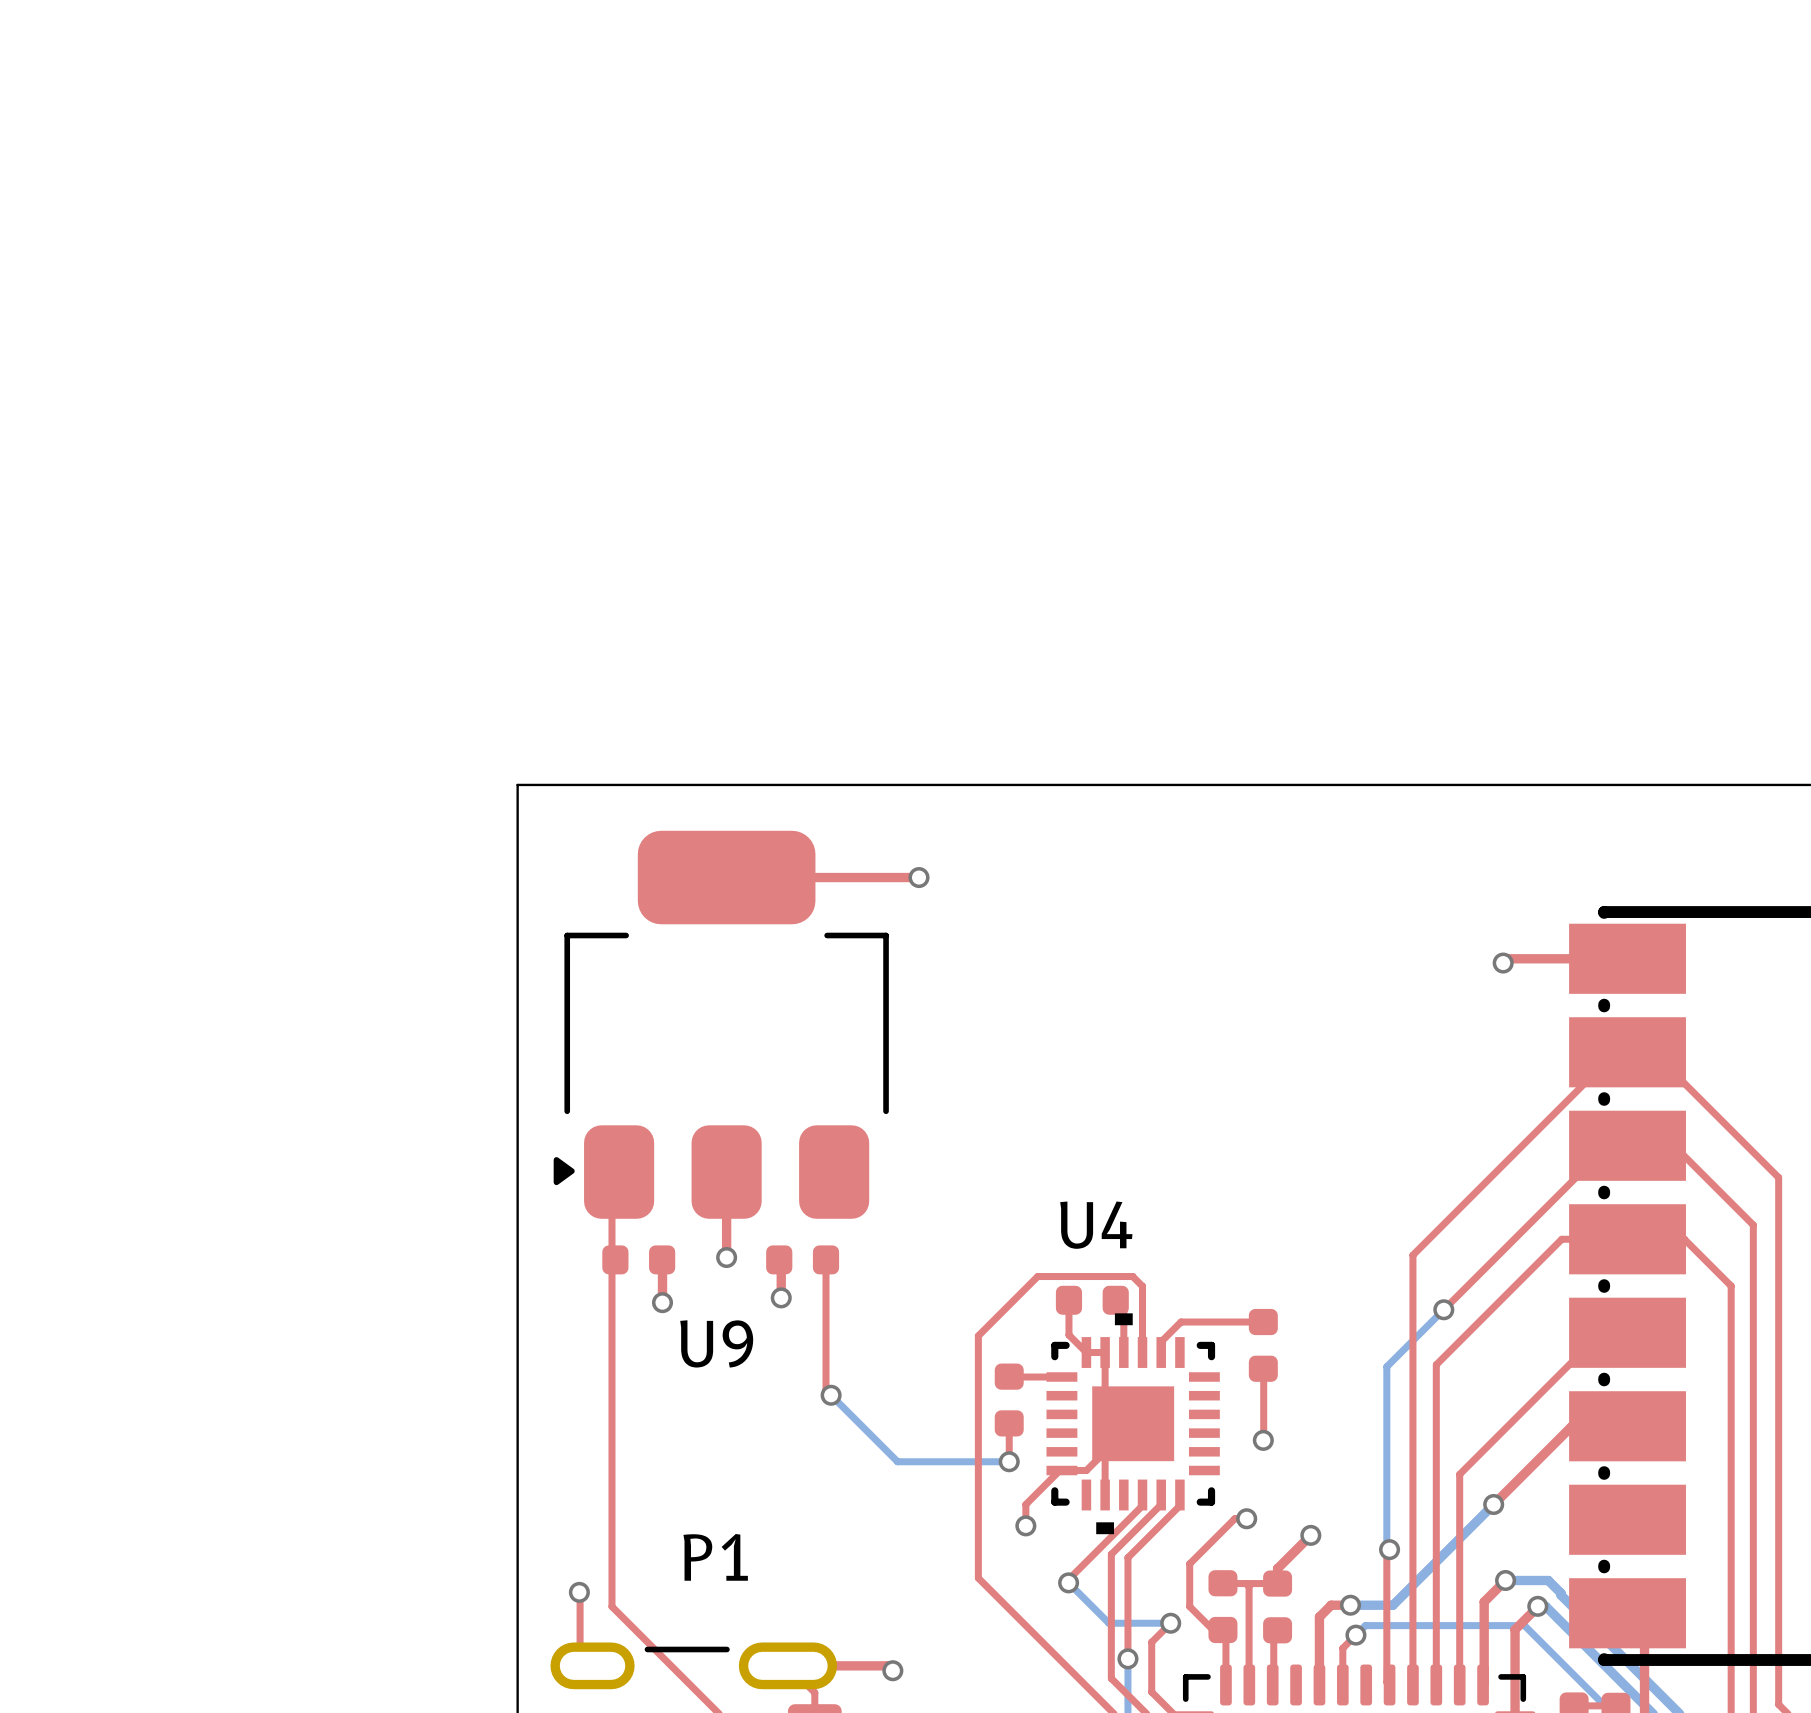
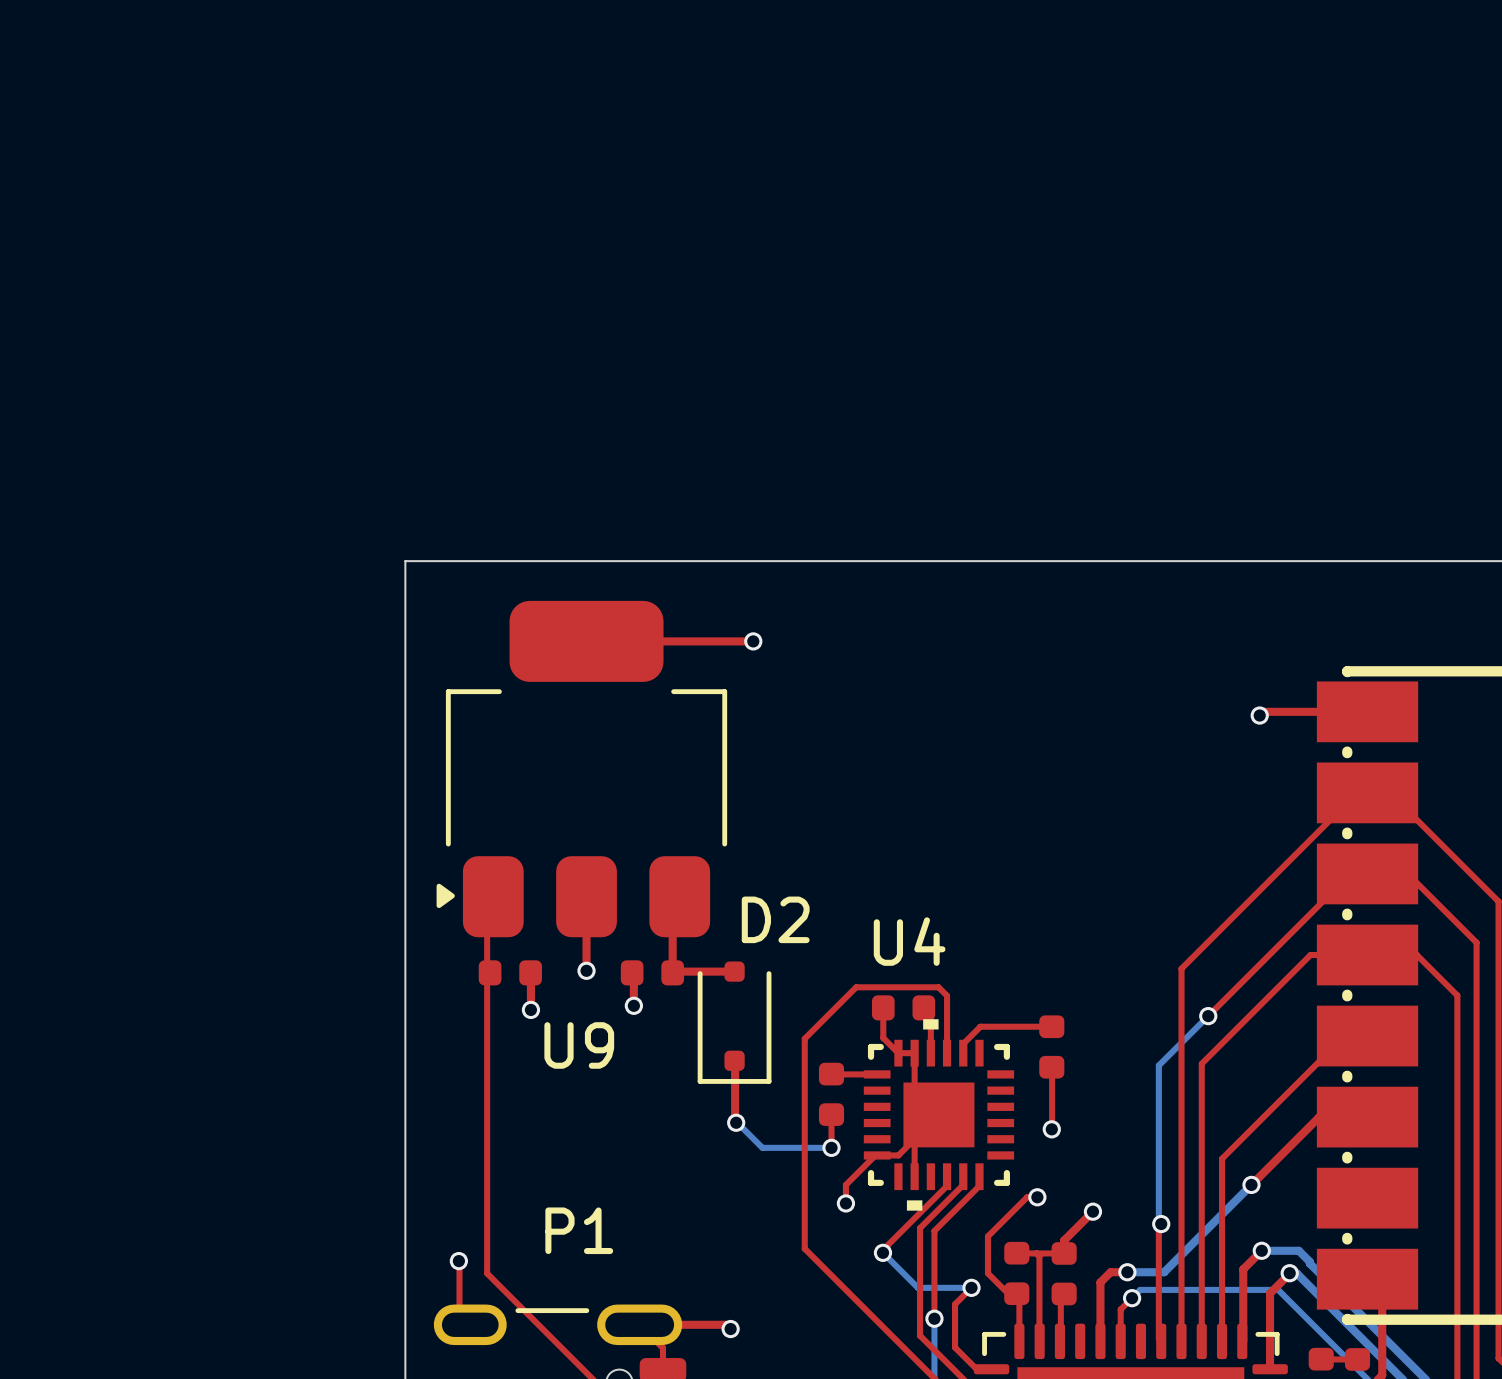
top track: none -> (679, 896) (672, 903) (672, 972) (734, 971)
top track: (825, 1259) (825, 1390) (831, 1395) -> none
D2: none -> (734, 1022)
top track: none -> (735, 1061) (736, 1122)
bottom track: (831, 1395) (897, 1461) (929, 1461) -> (736, 1122) (762, 1147)
via position: (831, 1395) -> (736, 1122)

